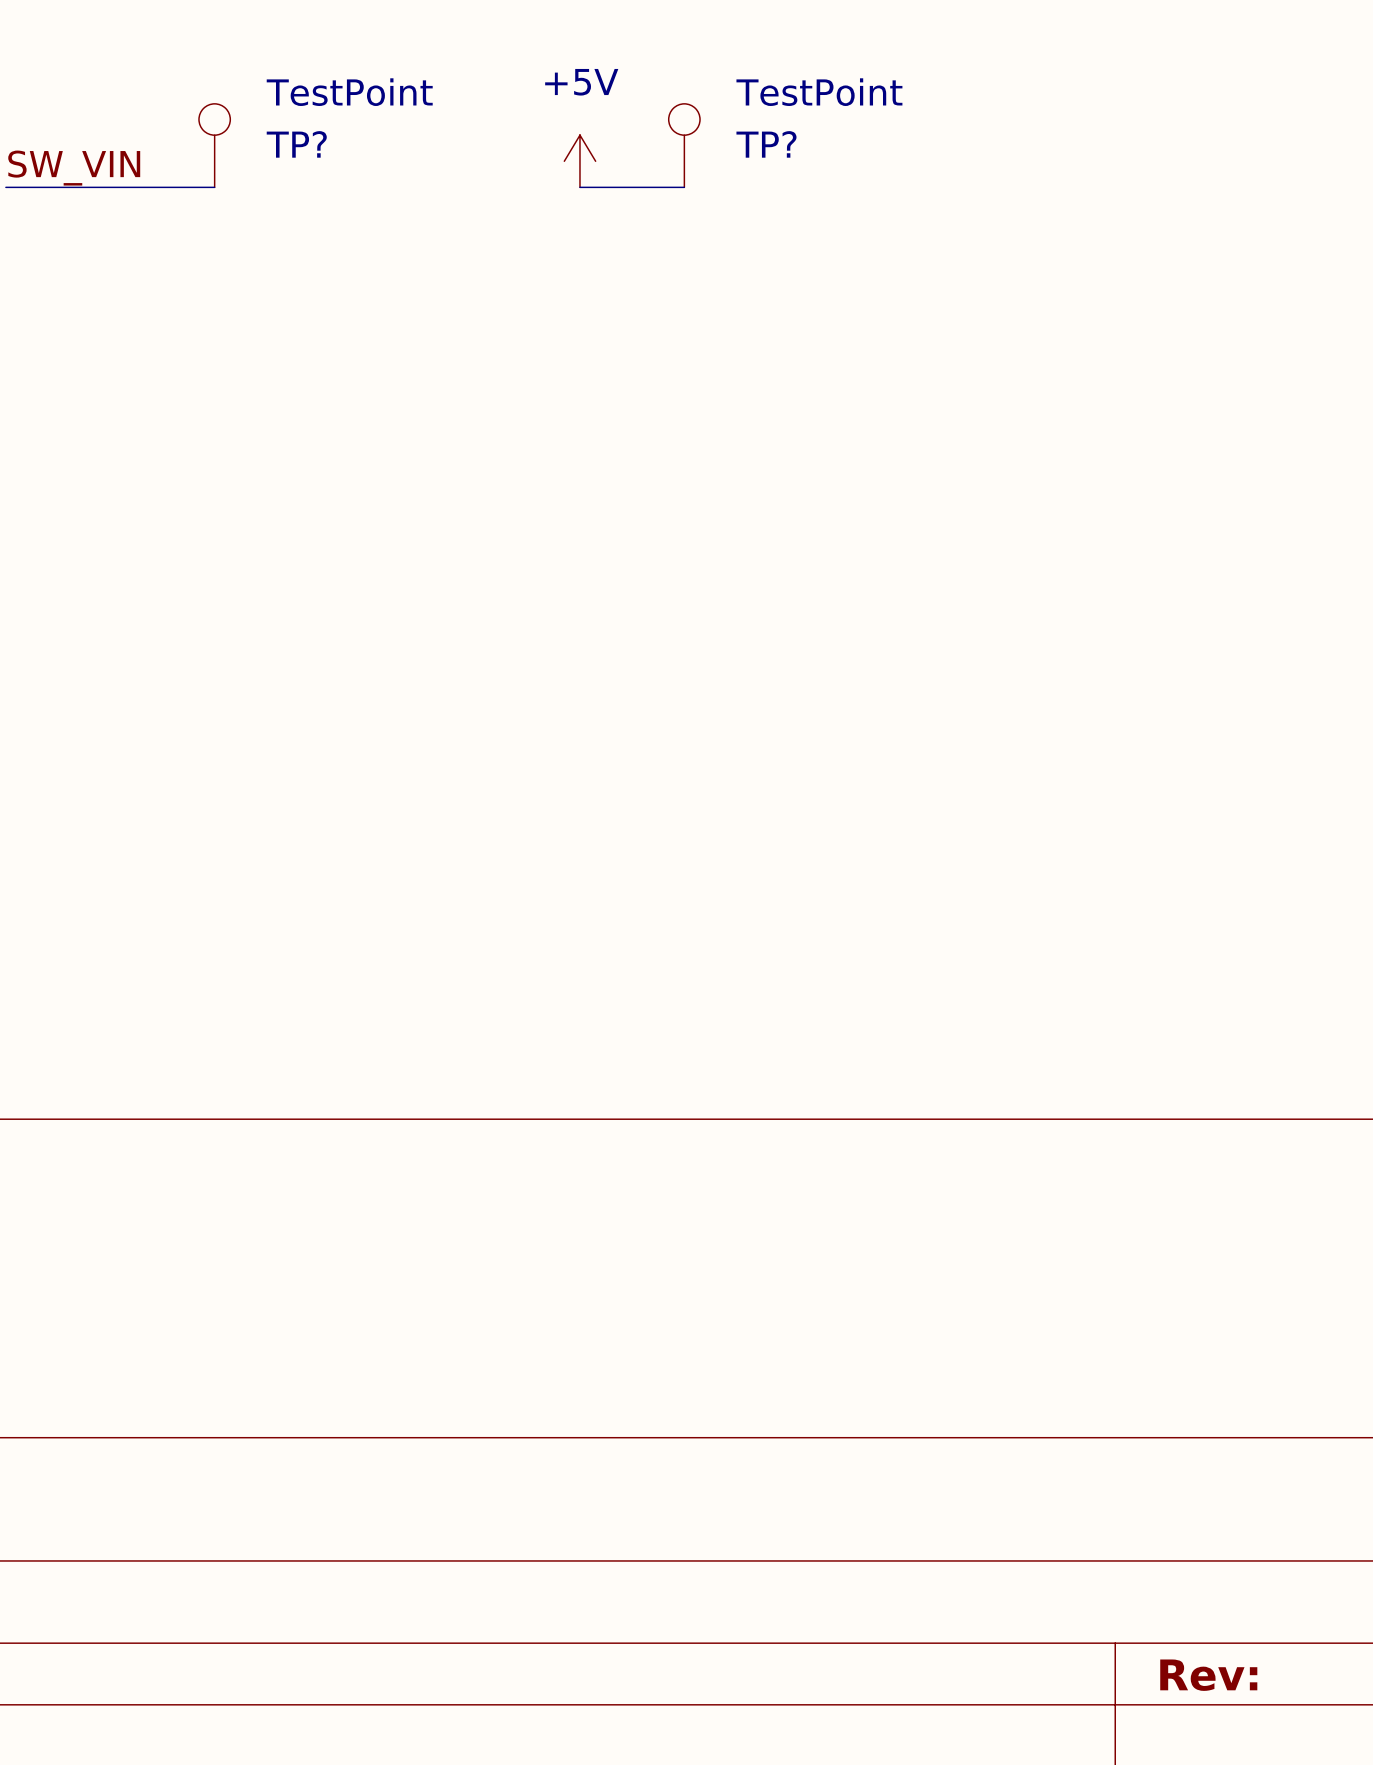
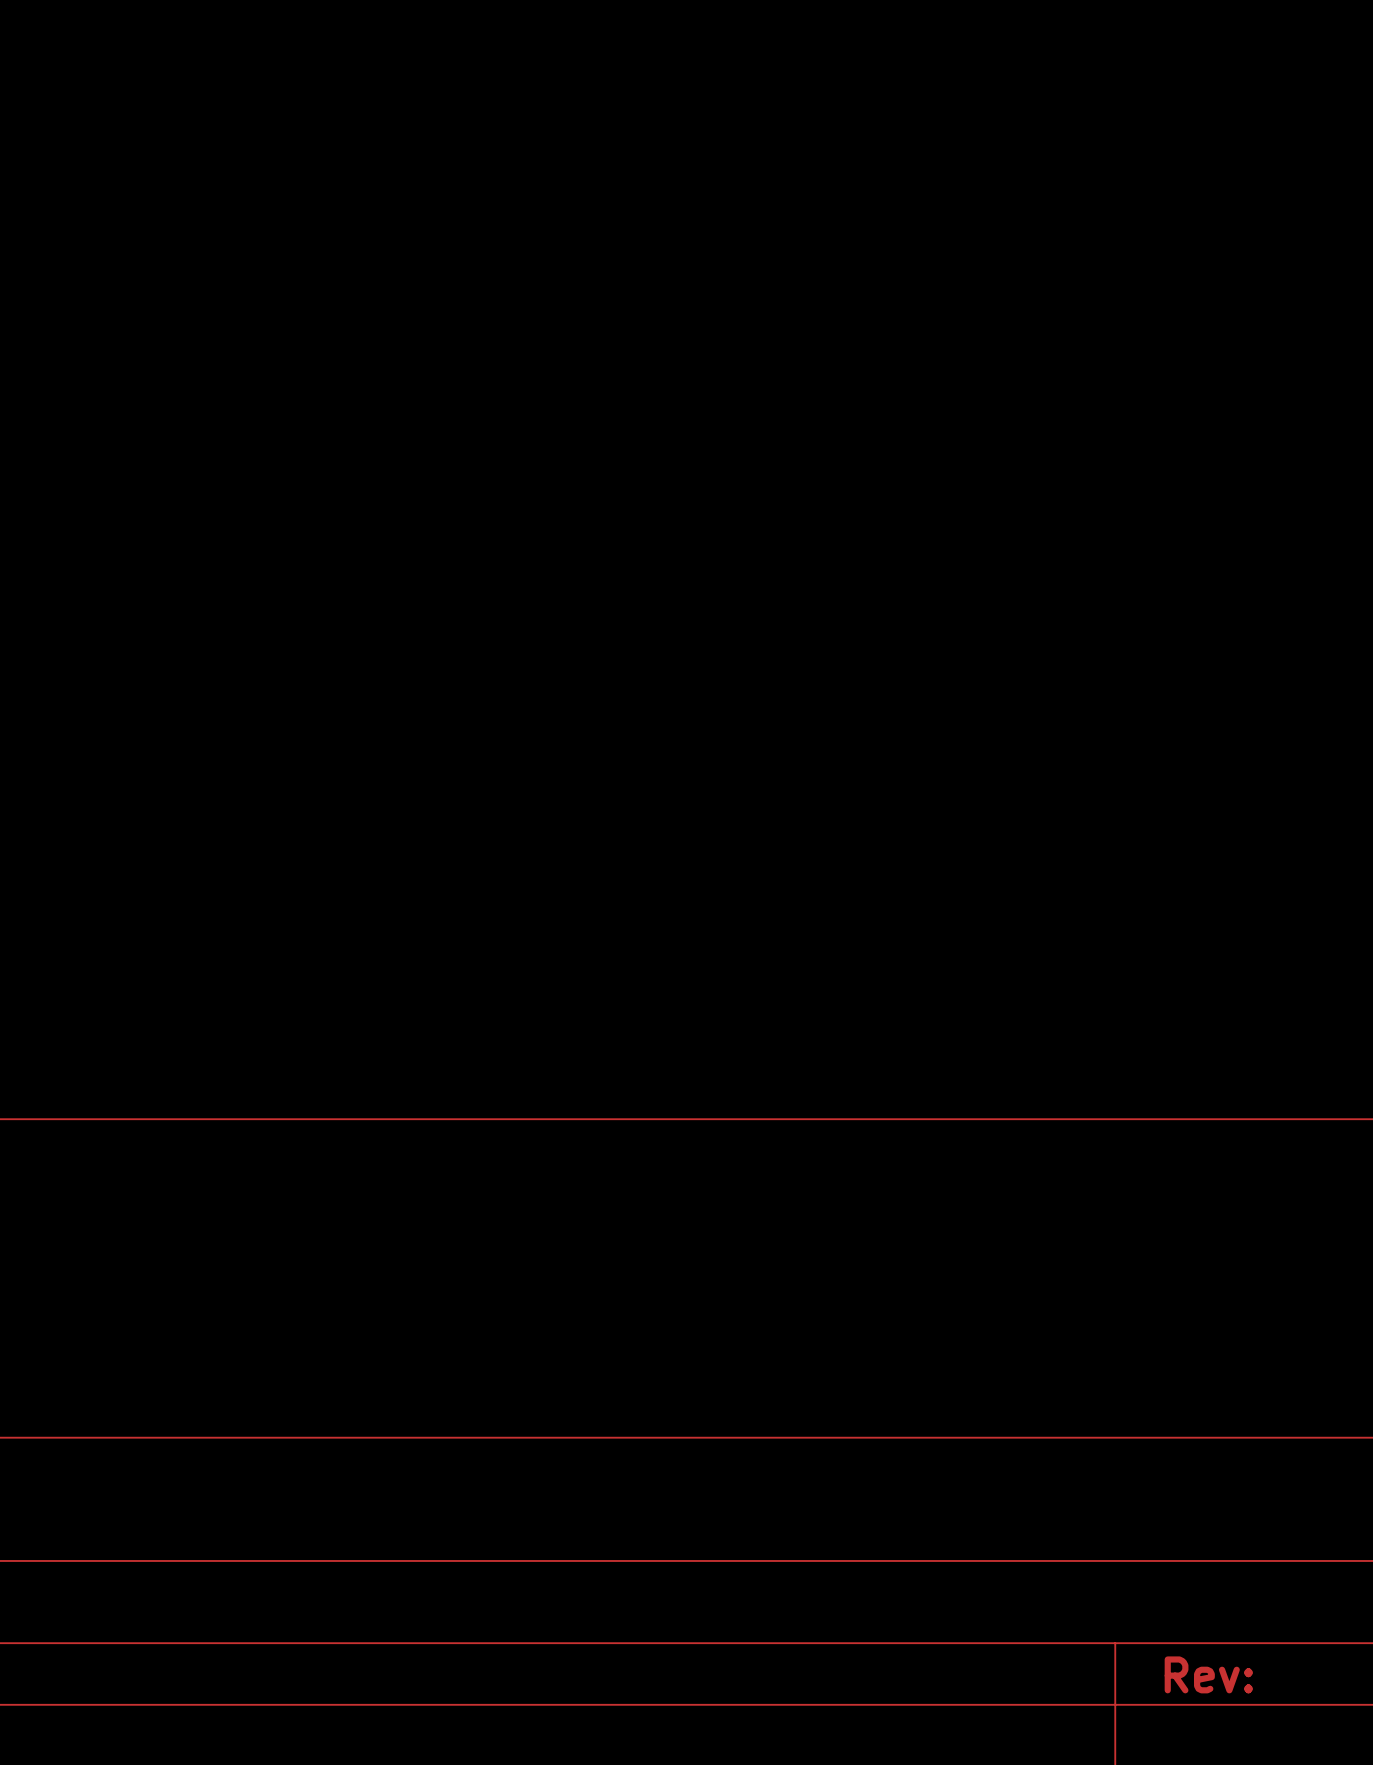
TP?: TestPoint (214, 145) -> none
TP?: TestPoint (684, 145) -> none
power symbol: +5V (579, 161) -> none
label: SW_VIN (74, 168) -> none
wire: (5, 187) (214, 187) -> none
wire: (579, 187) (684, 187) -> none

